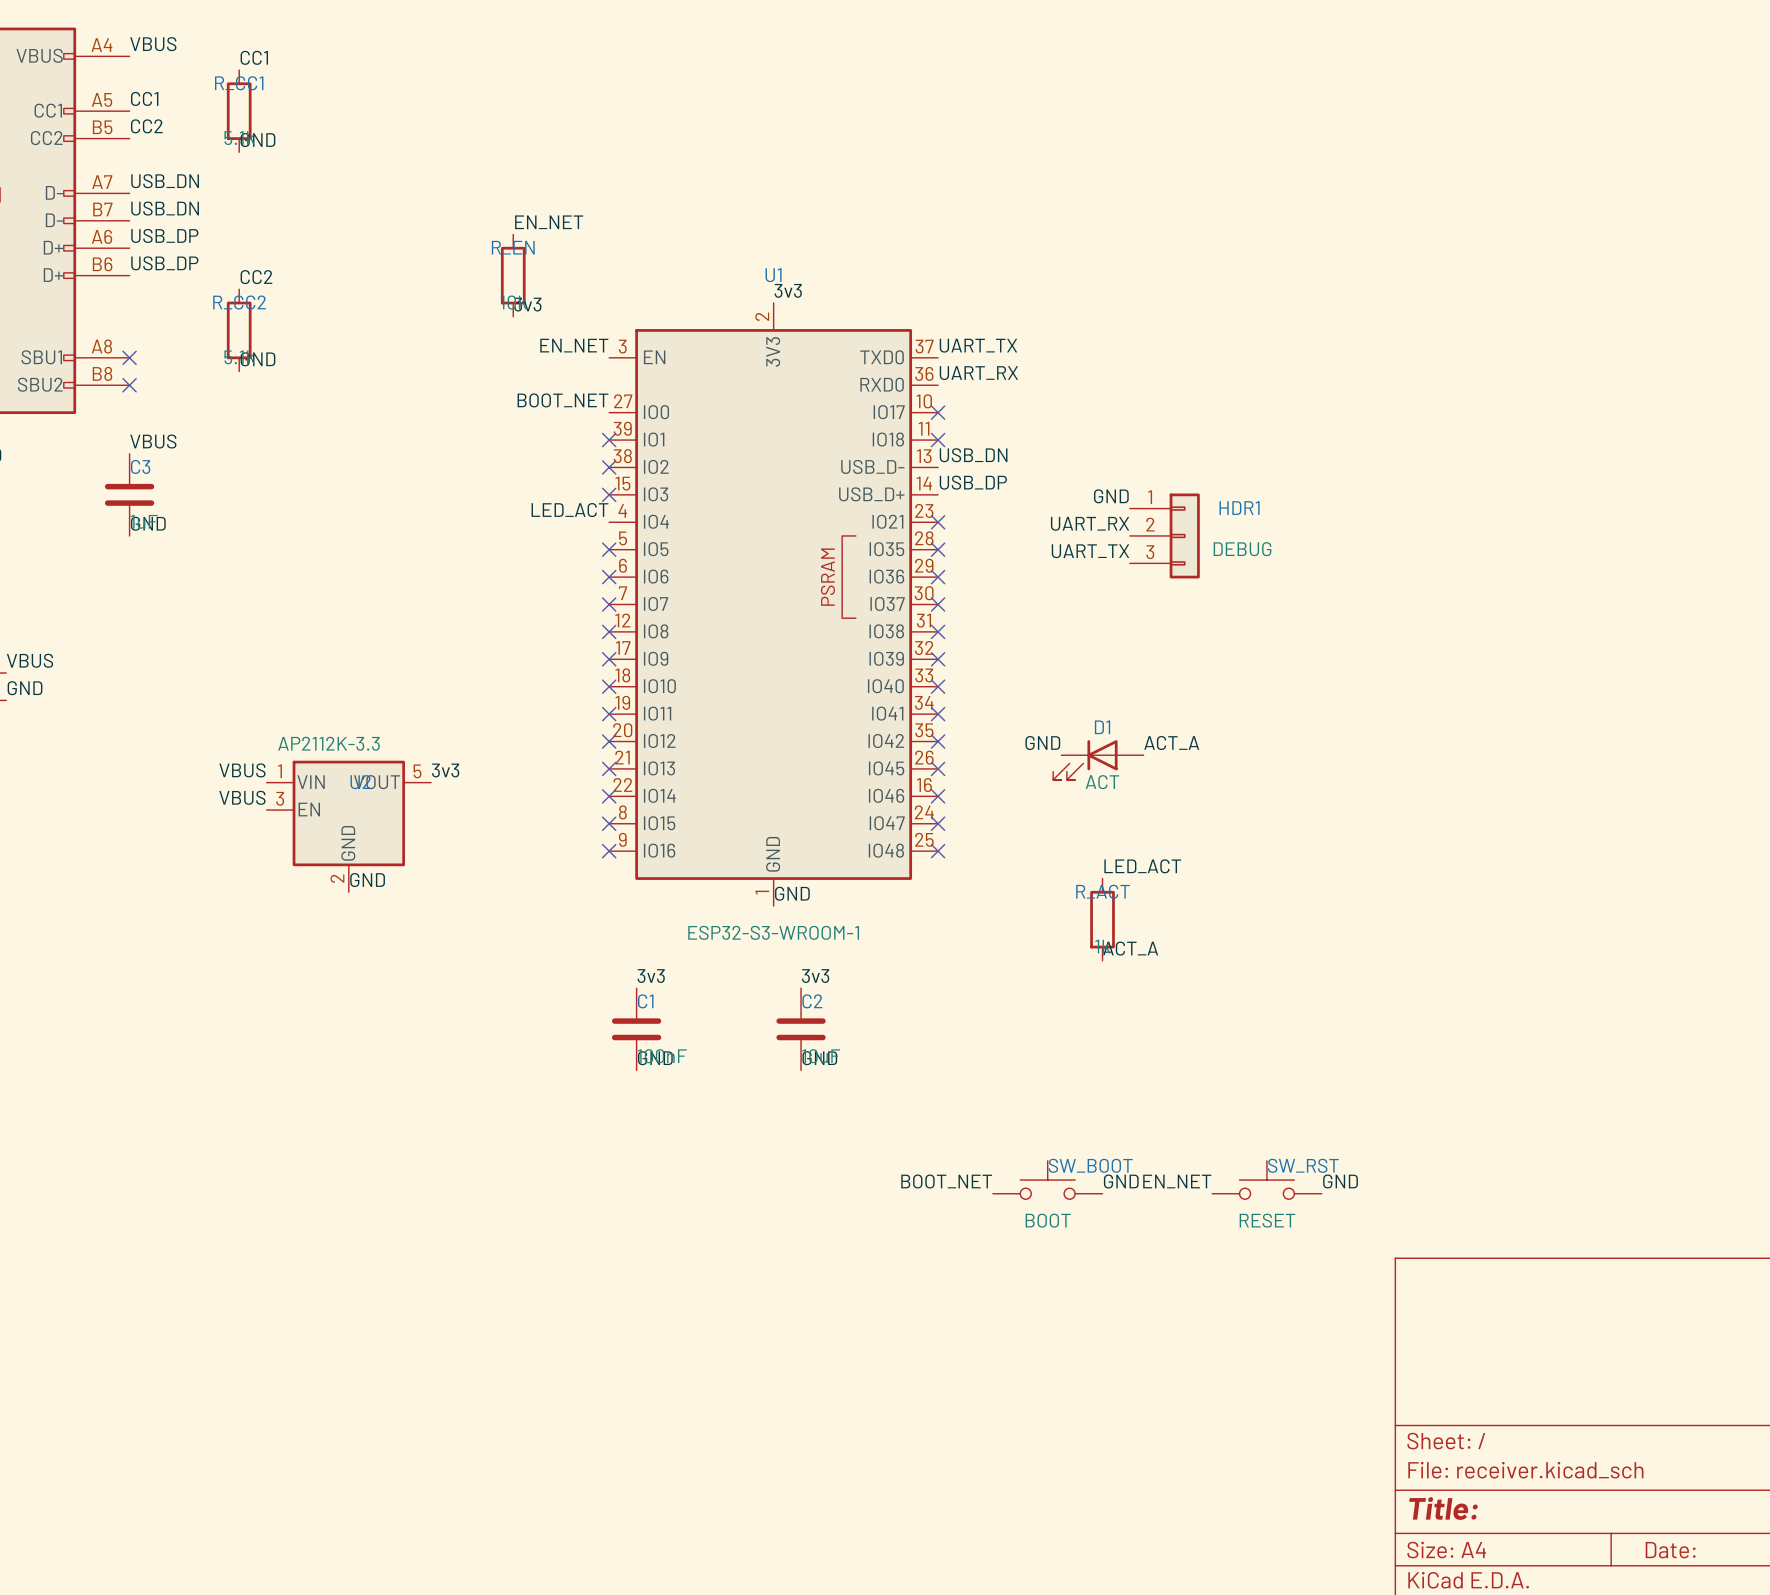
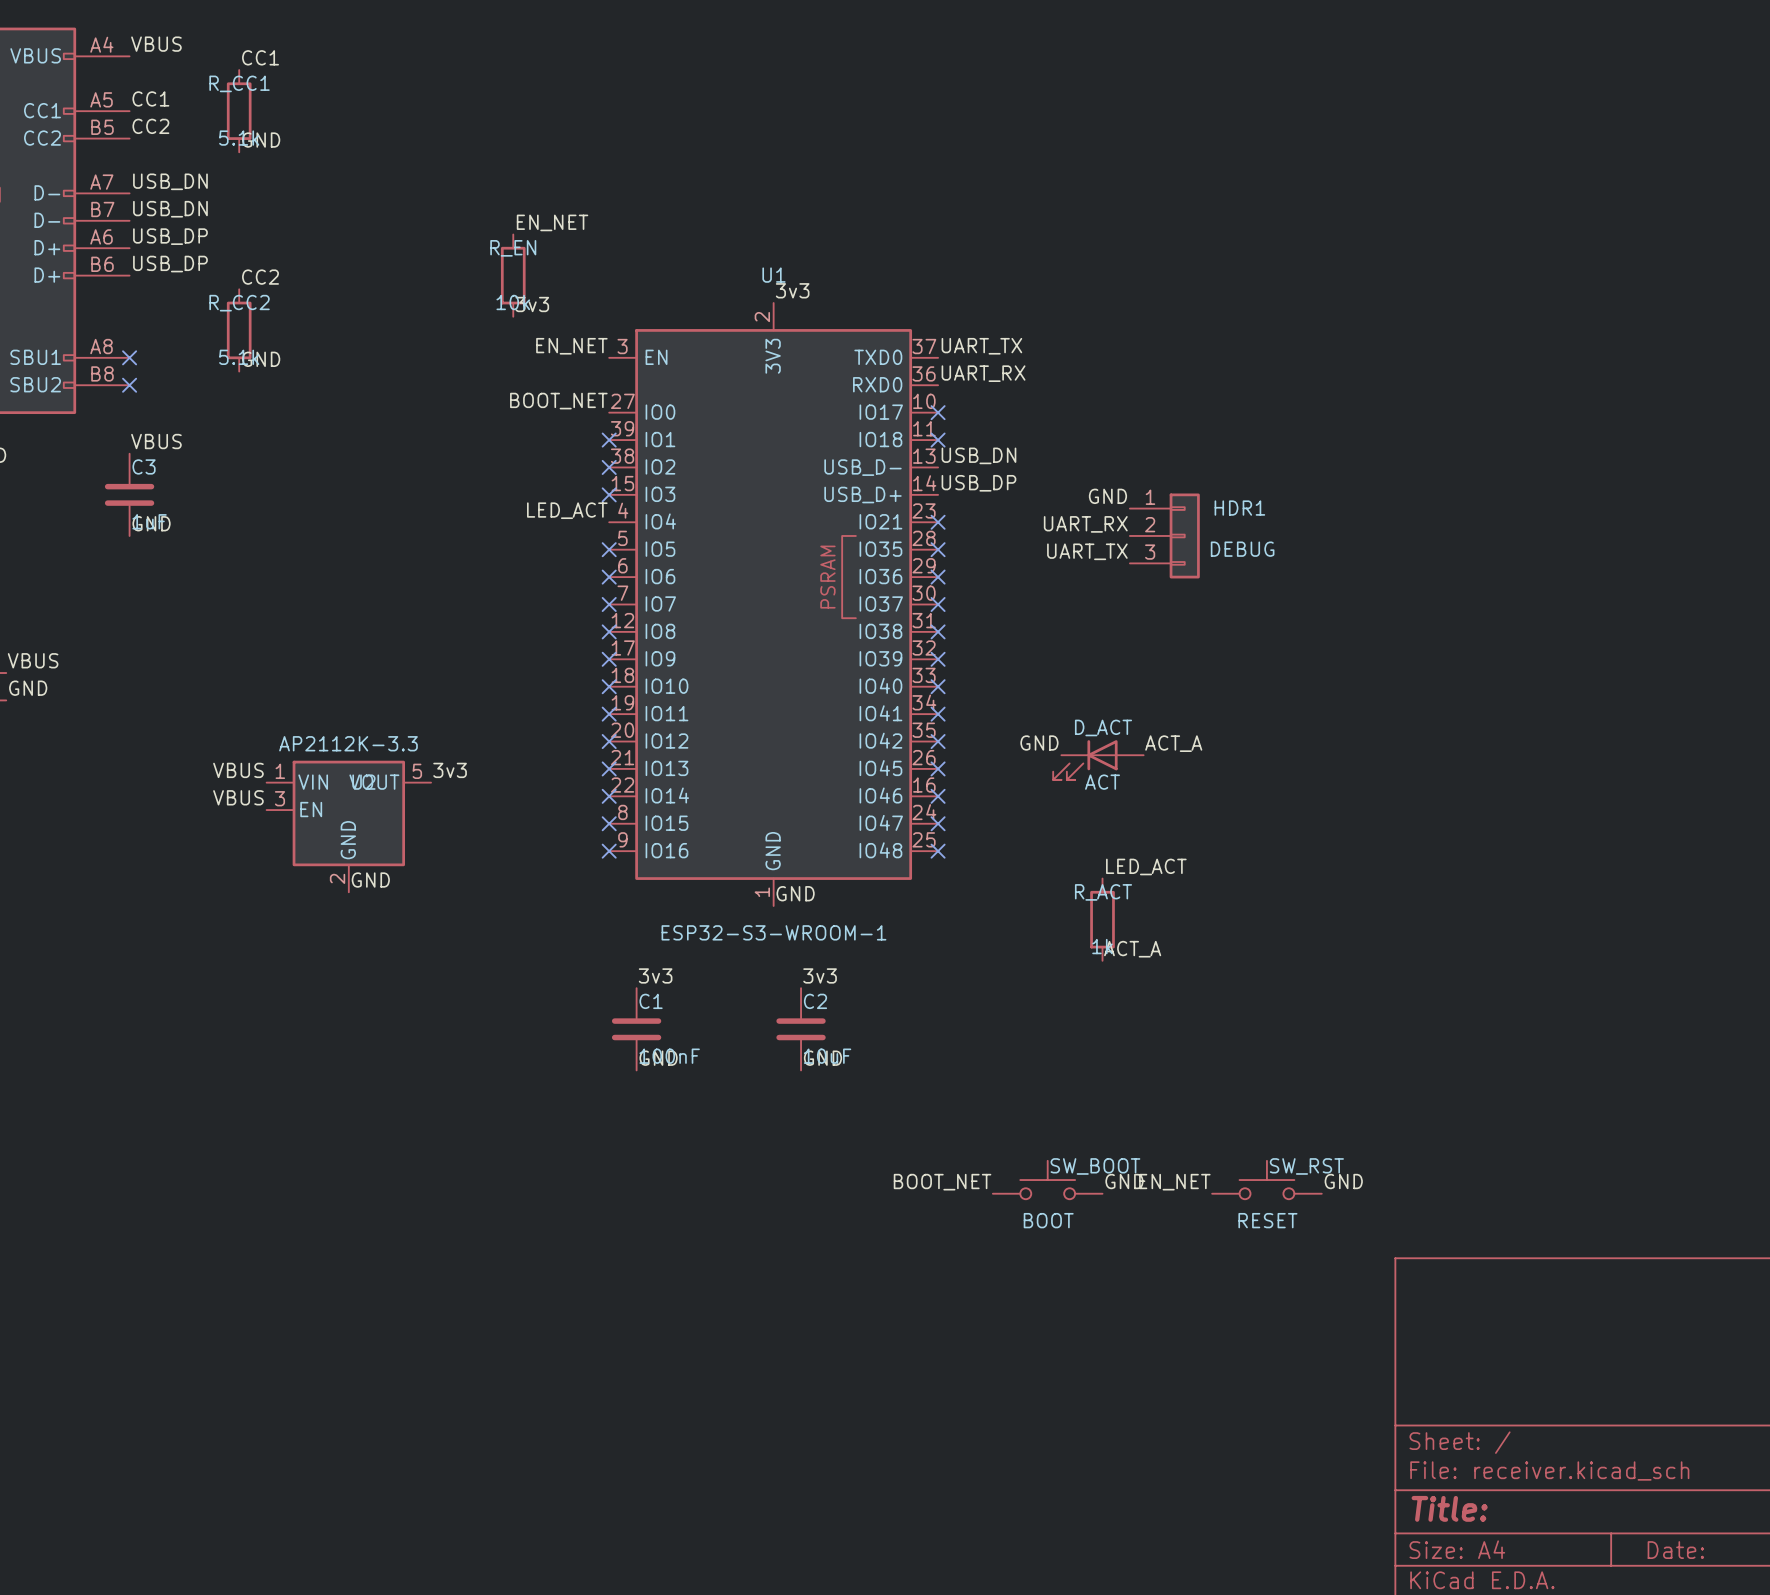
D1 name: D1 (1102, 727) -> D_ACT (1103, 727)

